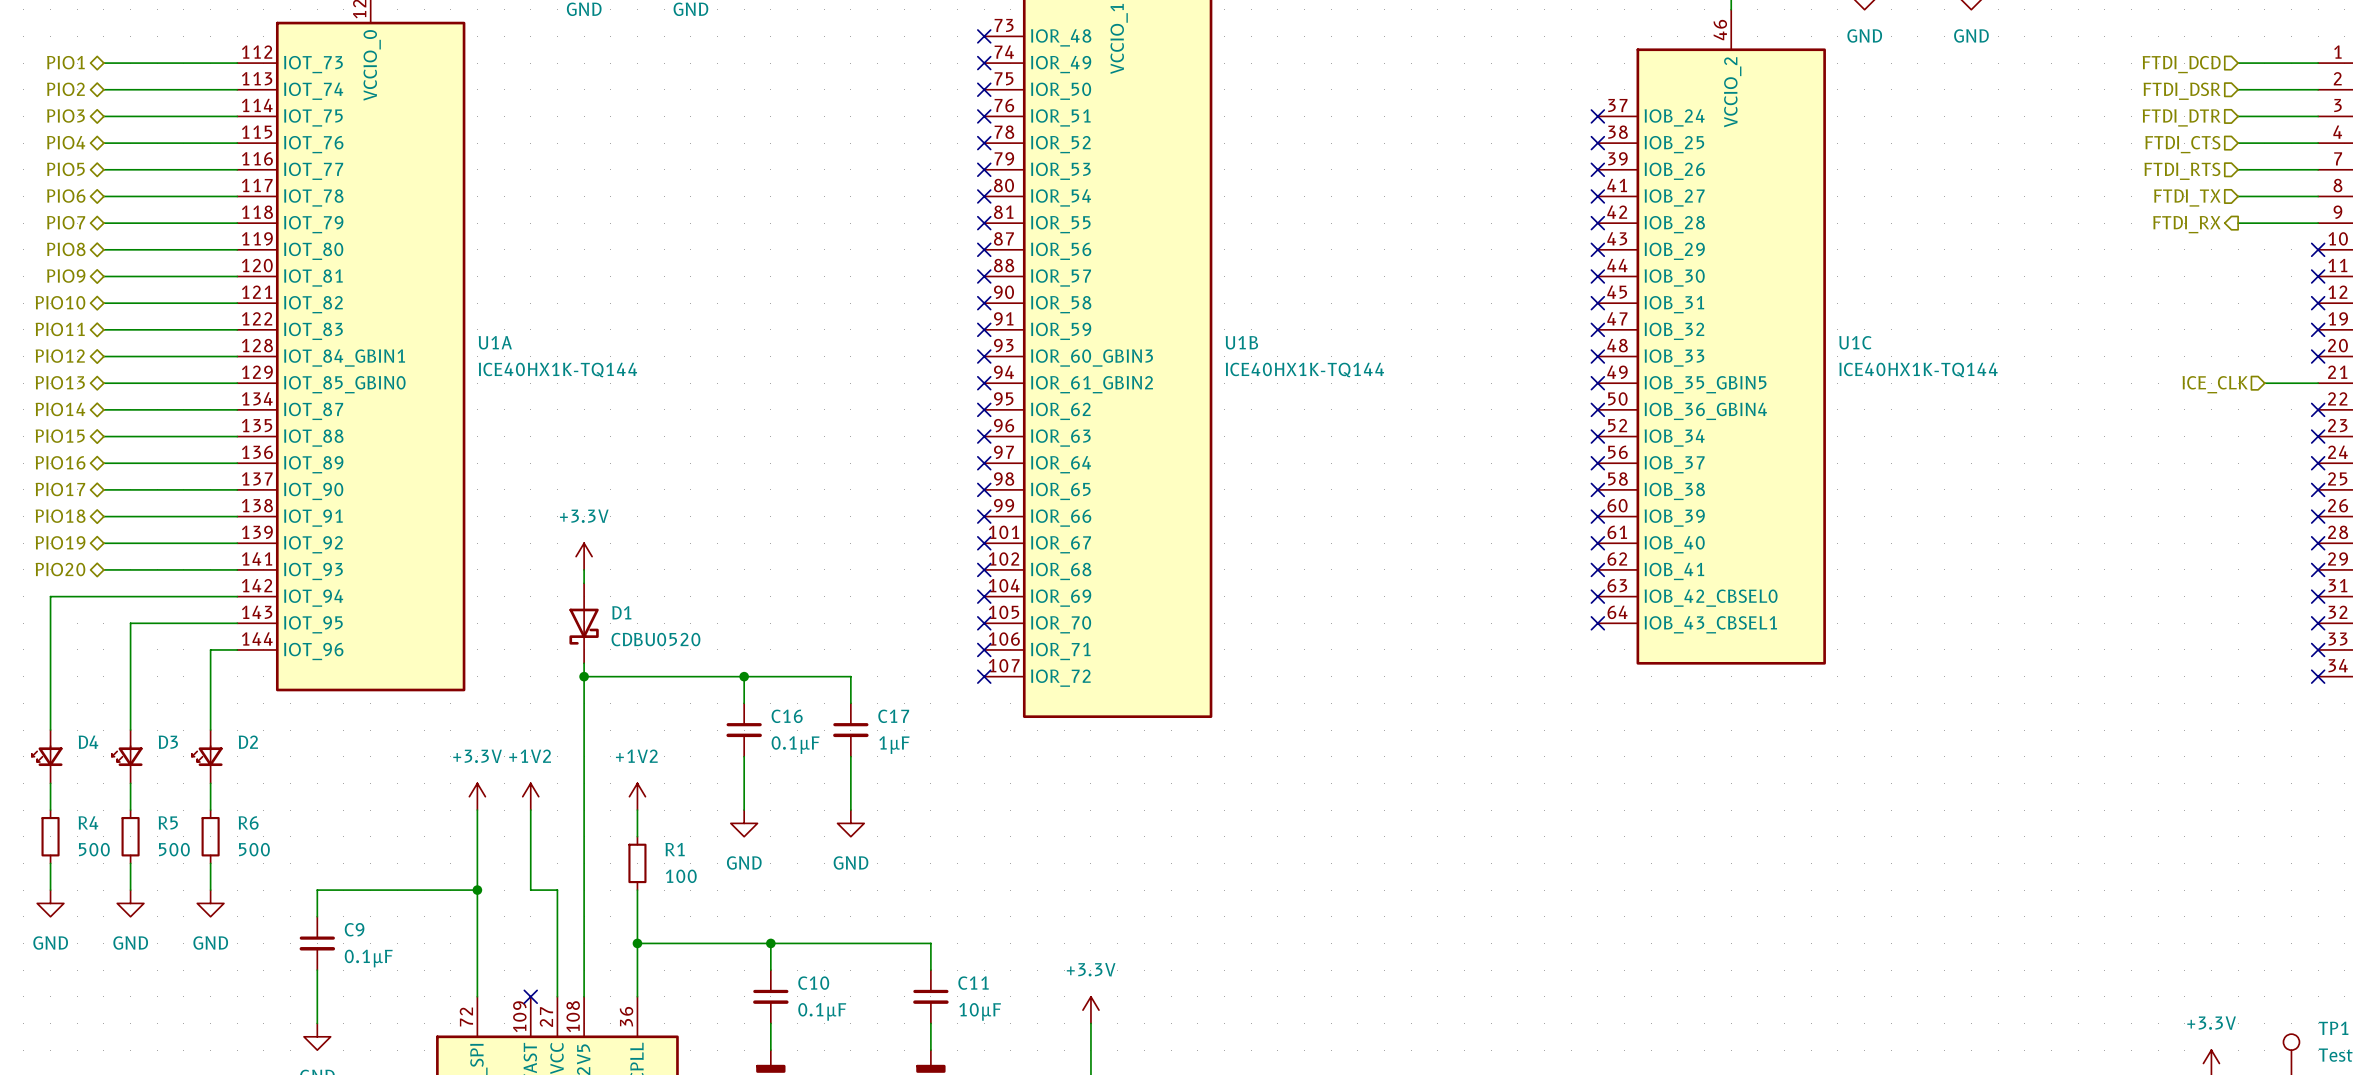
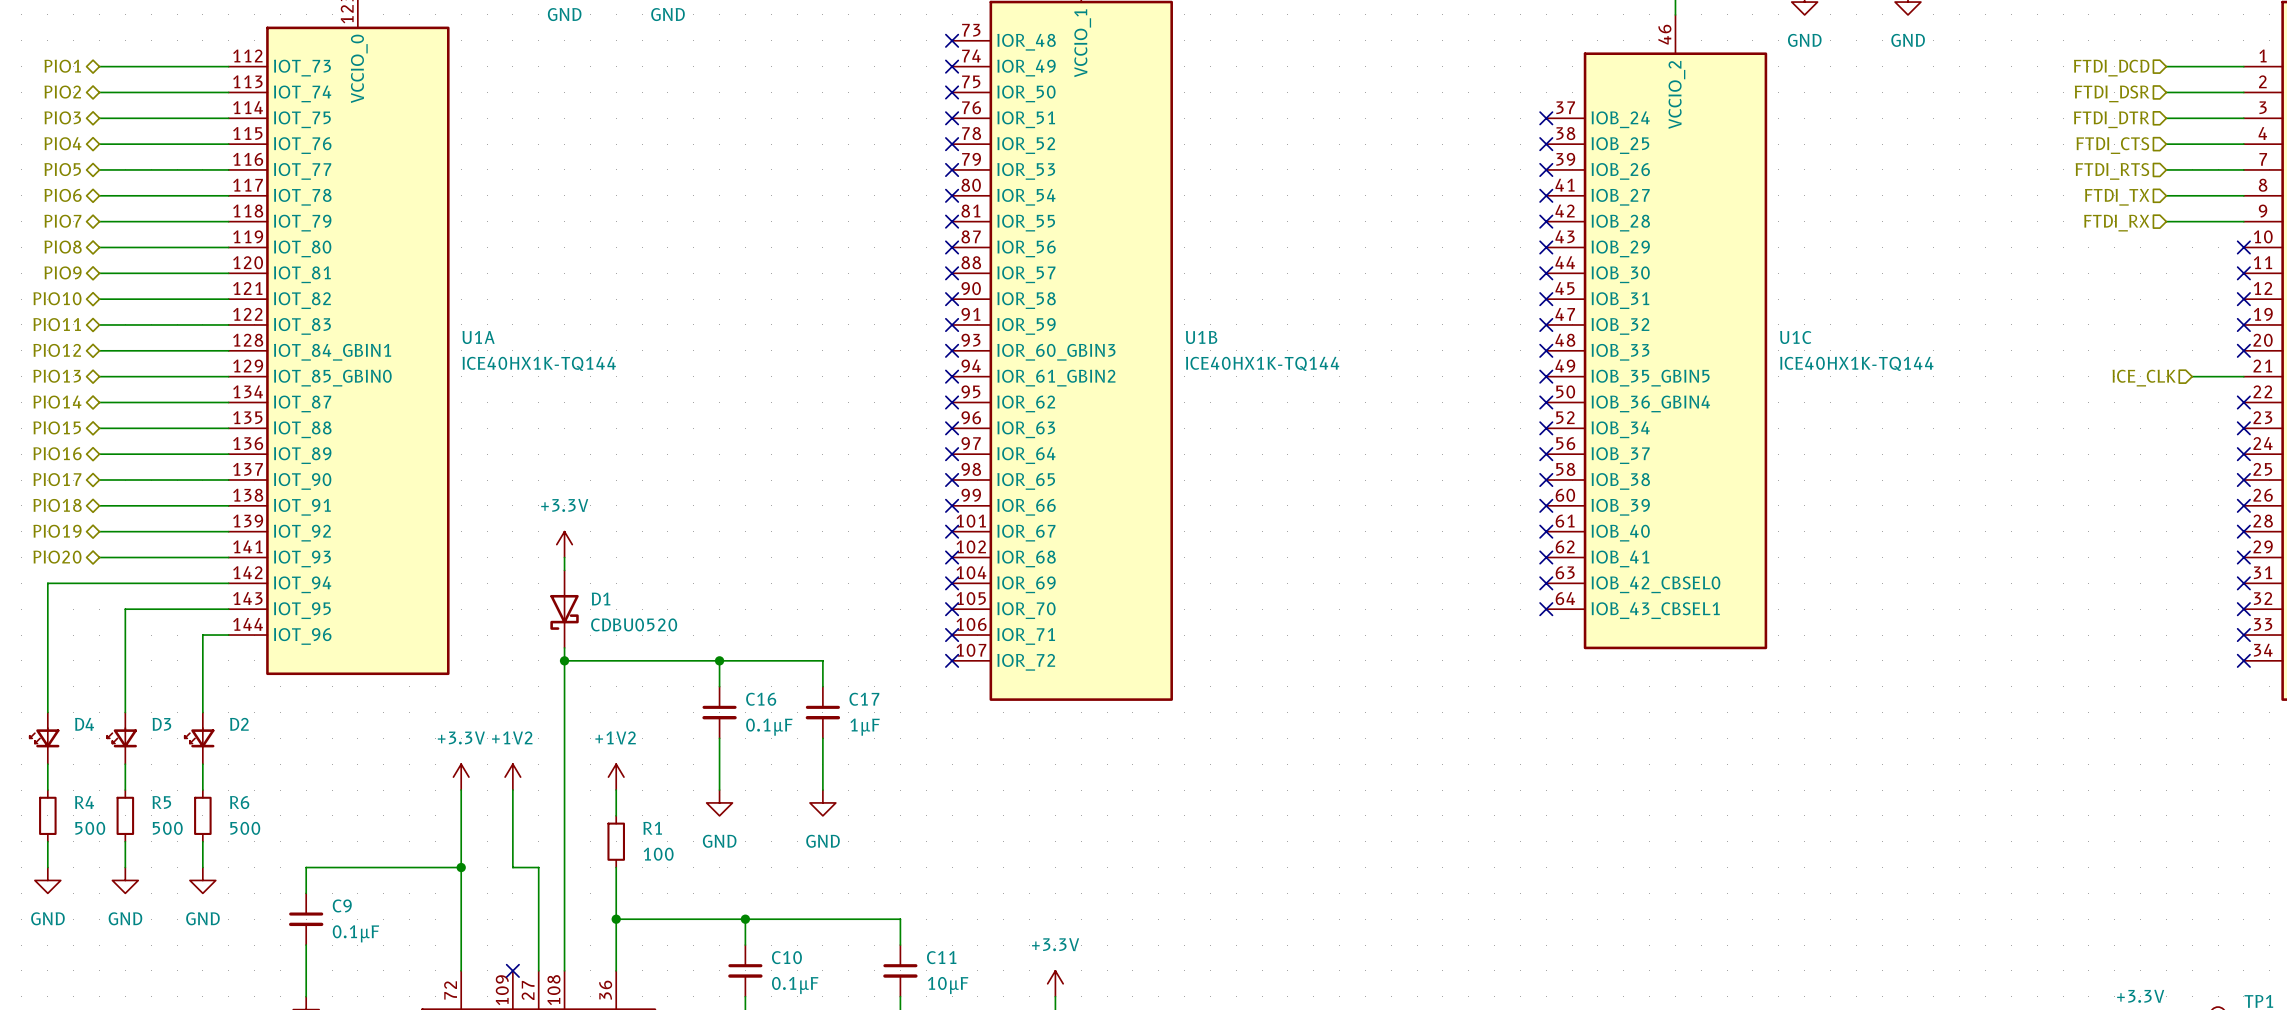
hierarchical label shape: output (2186, 224) -> input (2116, 223)

